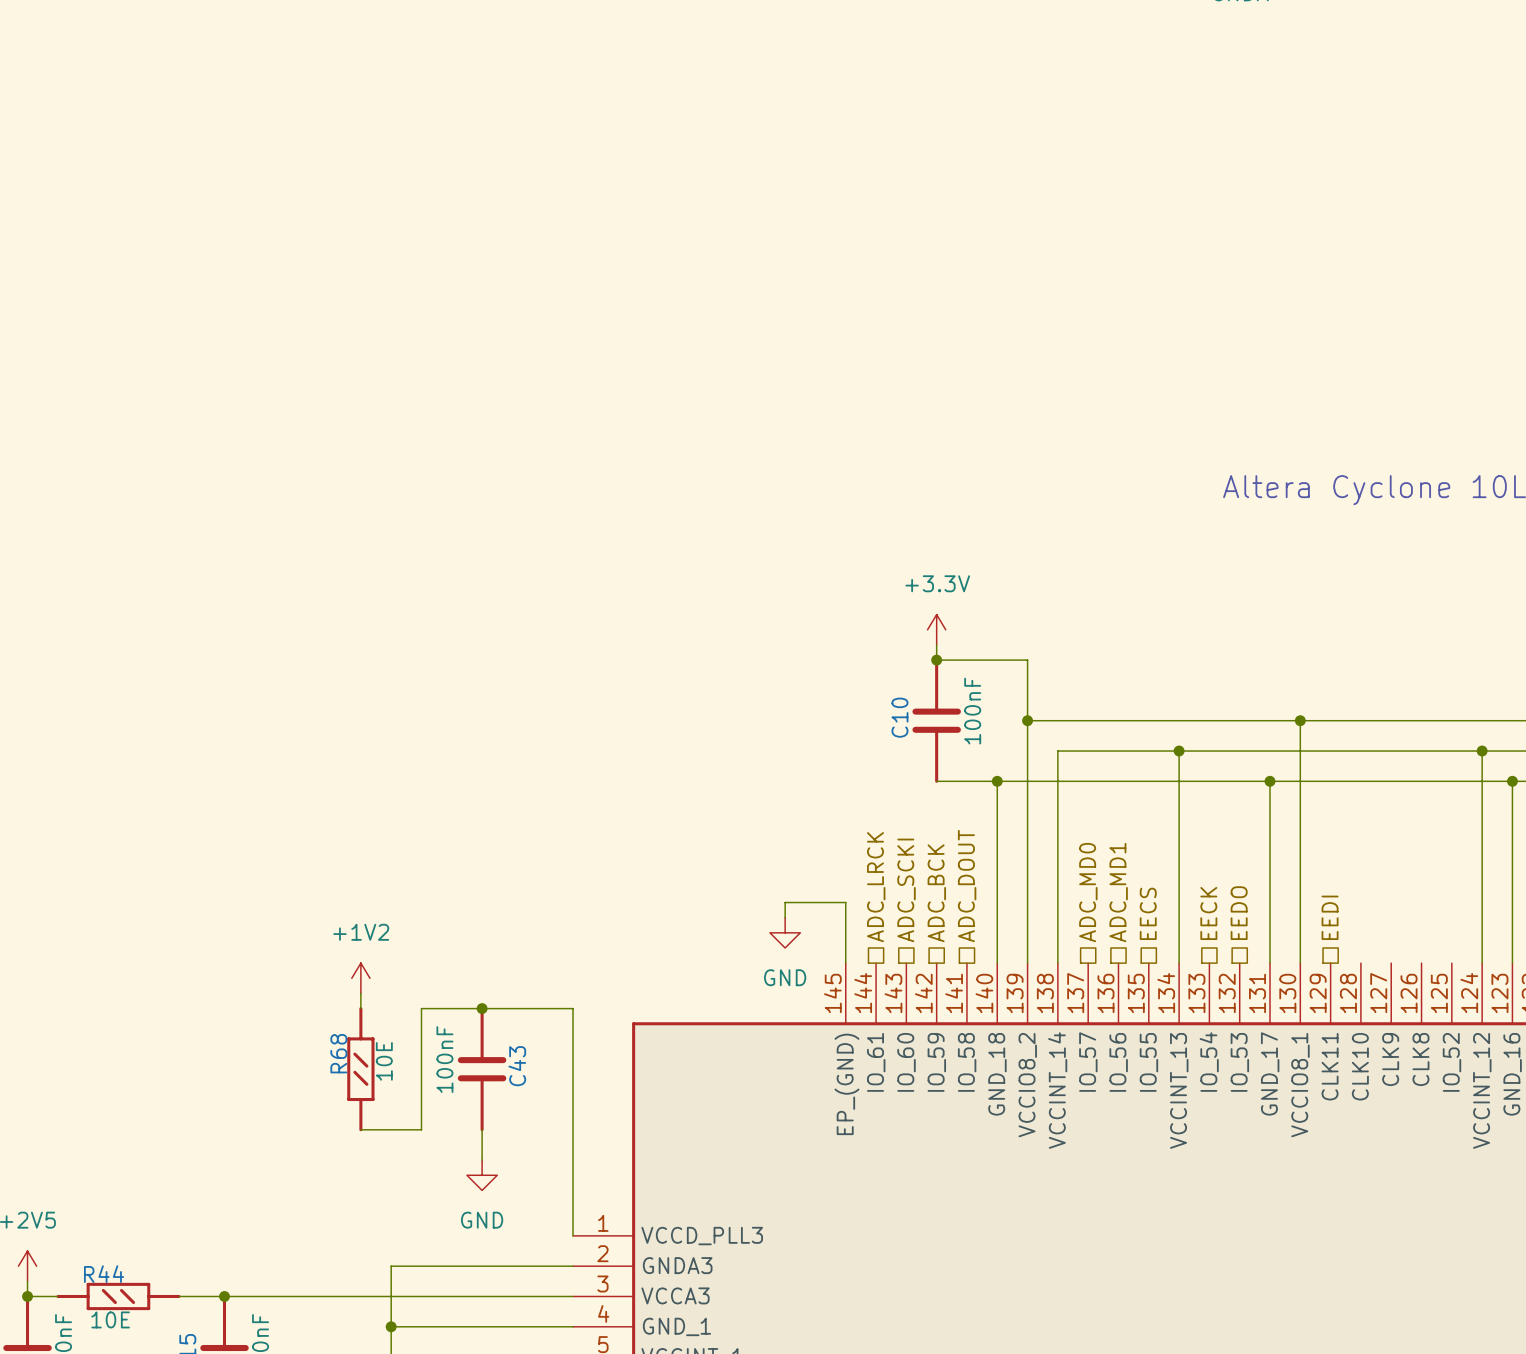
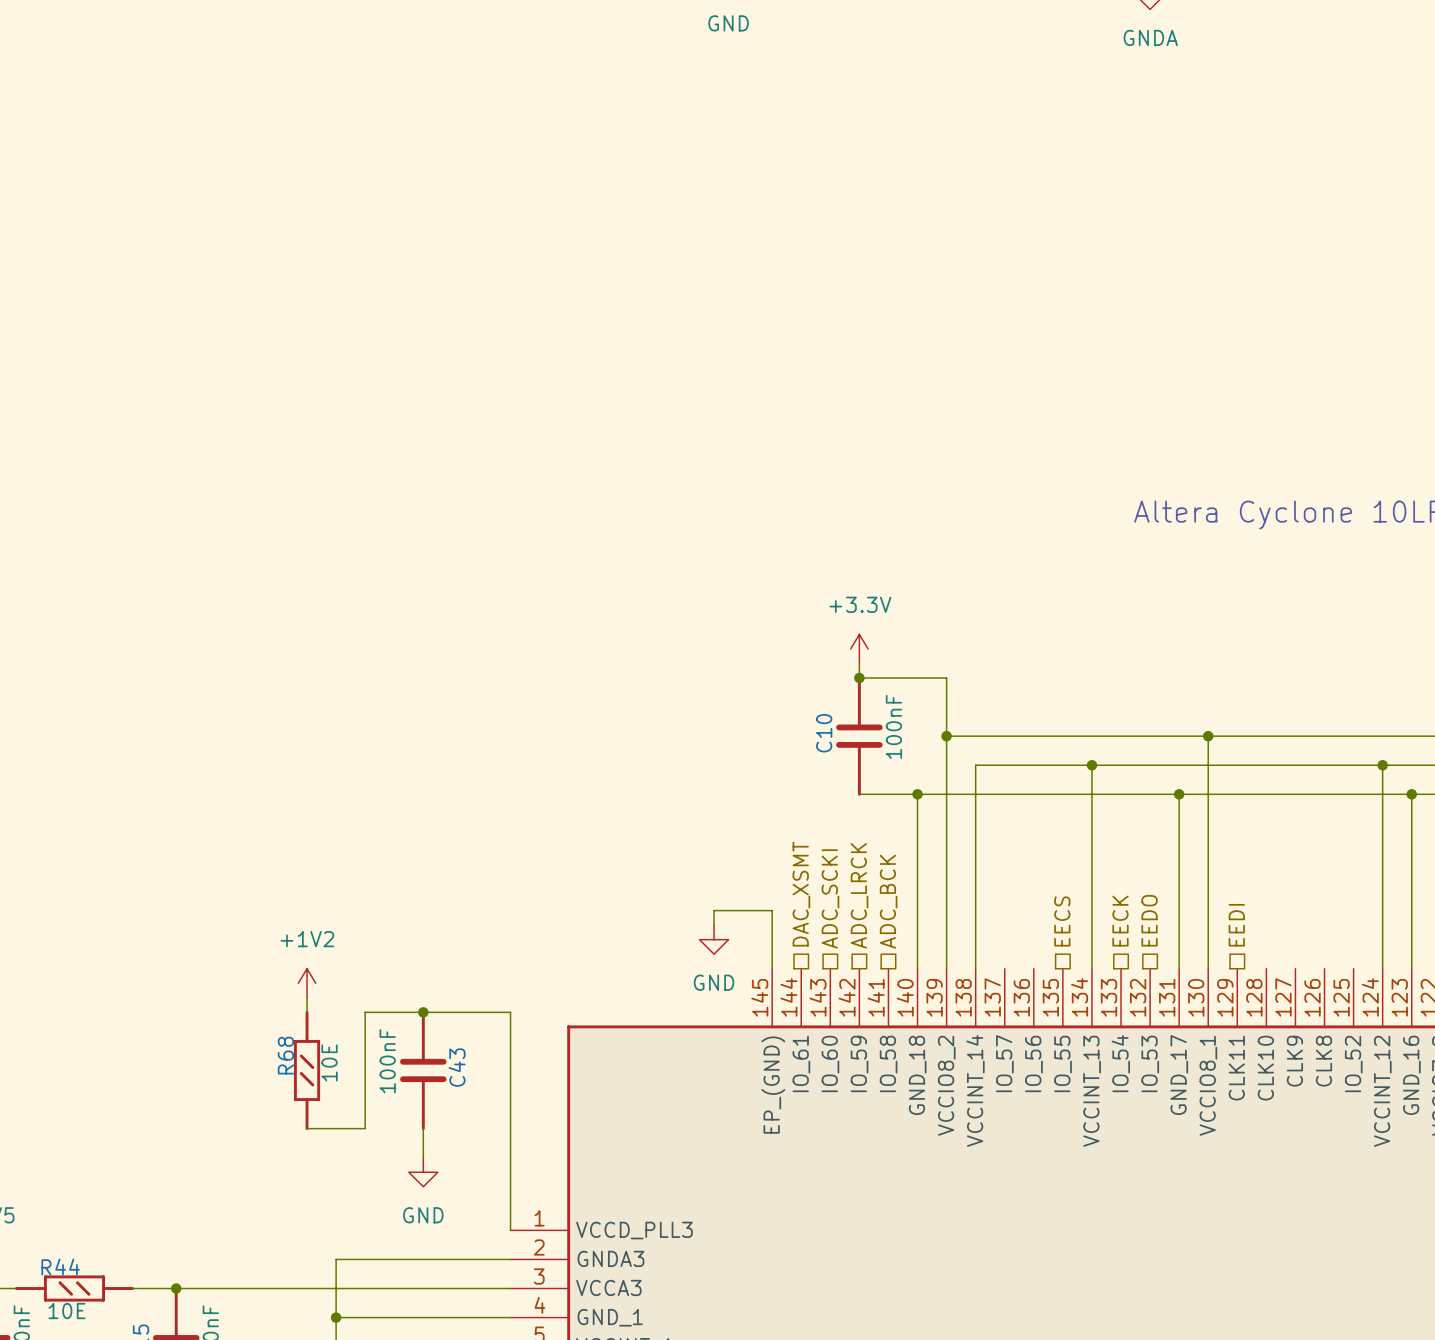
hierarchical label: ADC_DOUT (967, 886) -> ADC_BCK (888, 901)
hierarchical label: ADC_LRCK (876, 887) -> DAC_XSMT (801, 894)
hierarchical label: ADC_MD0 (1088, 892) -> none
hierarchical label: ADC_MD1 (1118, 892) -> none
hierarchical label: ADC_BCK (936, 893) -> ADC_LRCK (859, 895)

